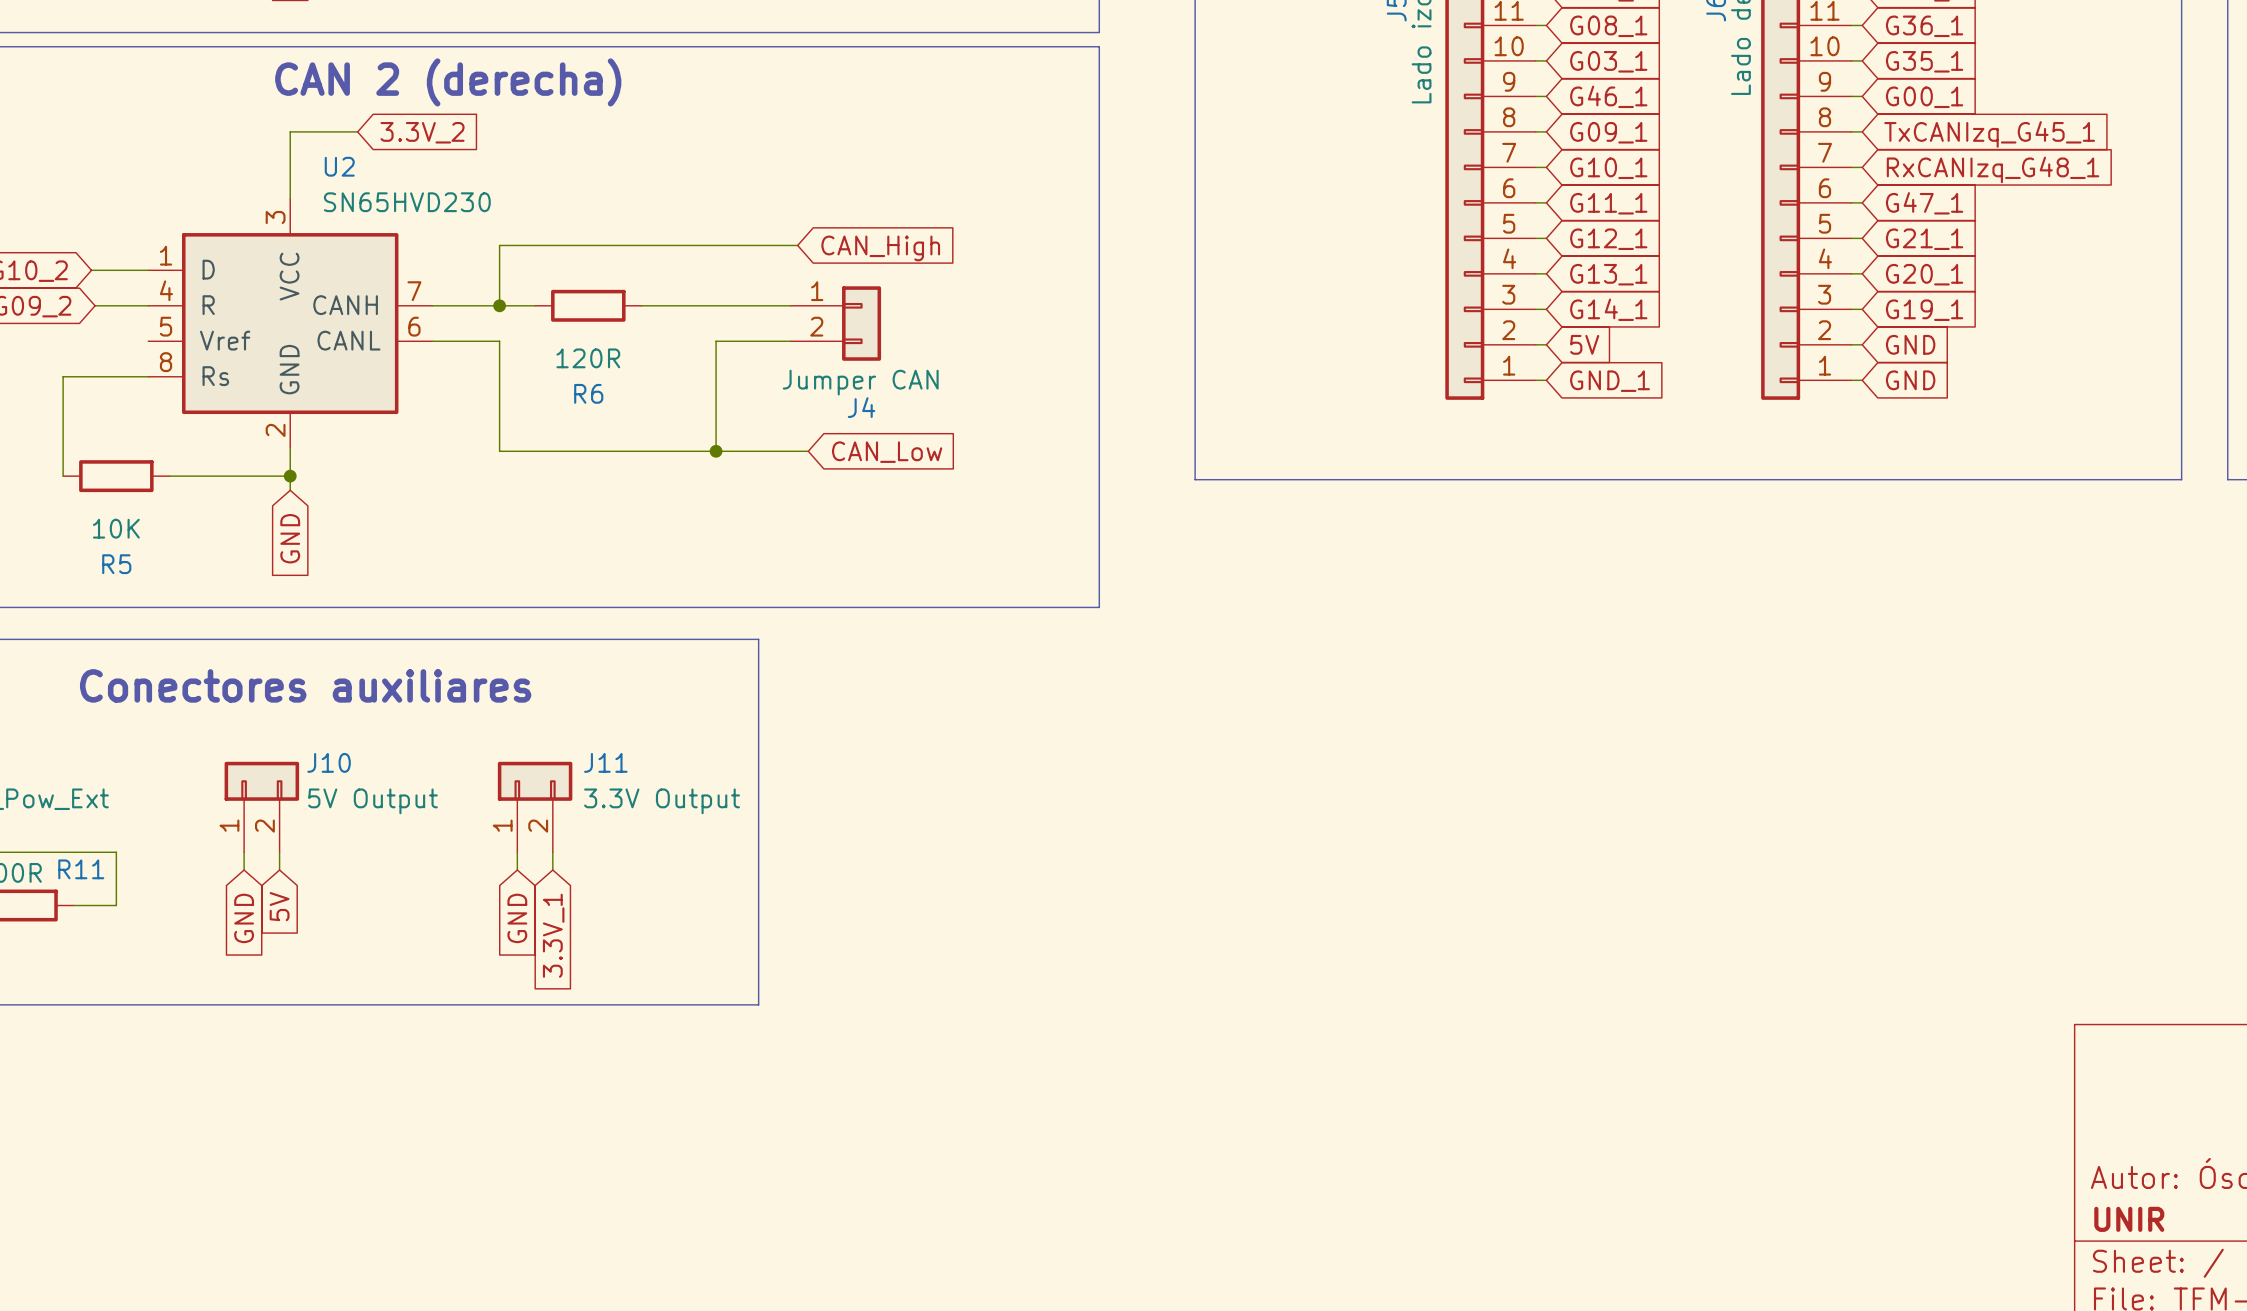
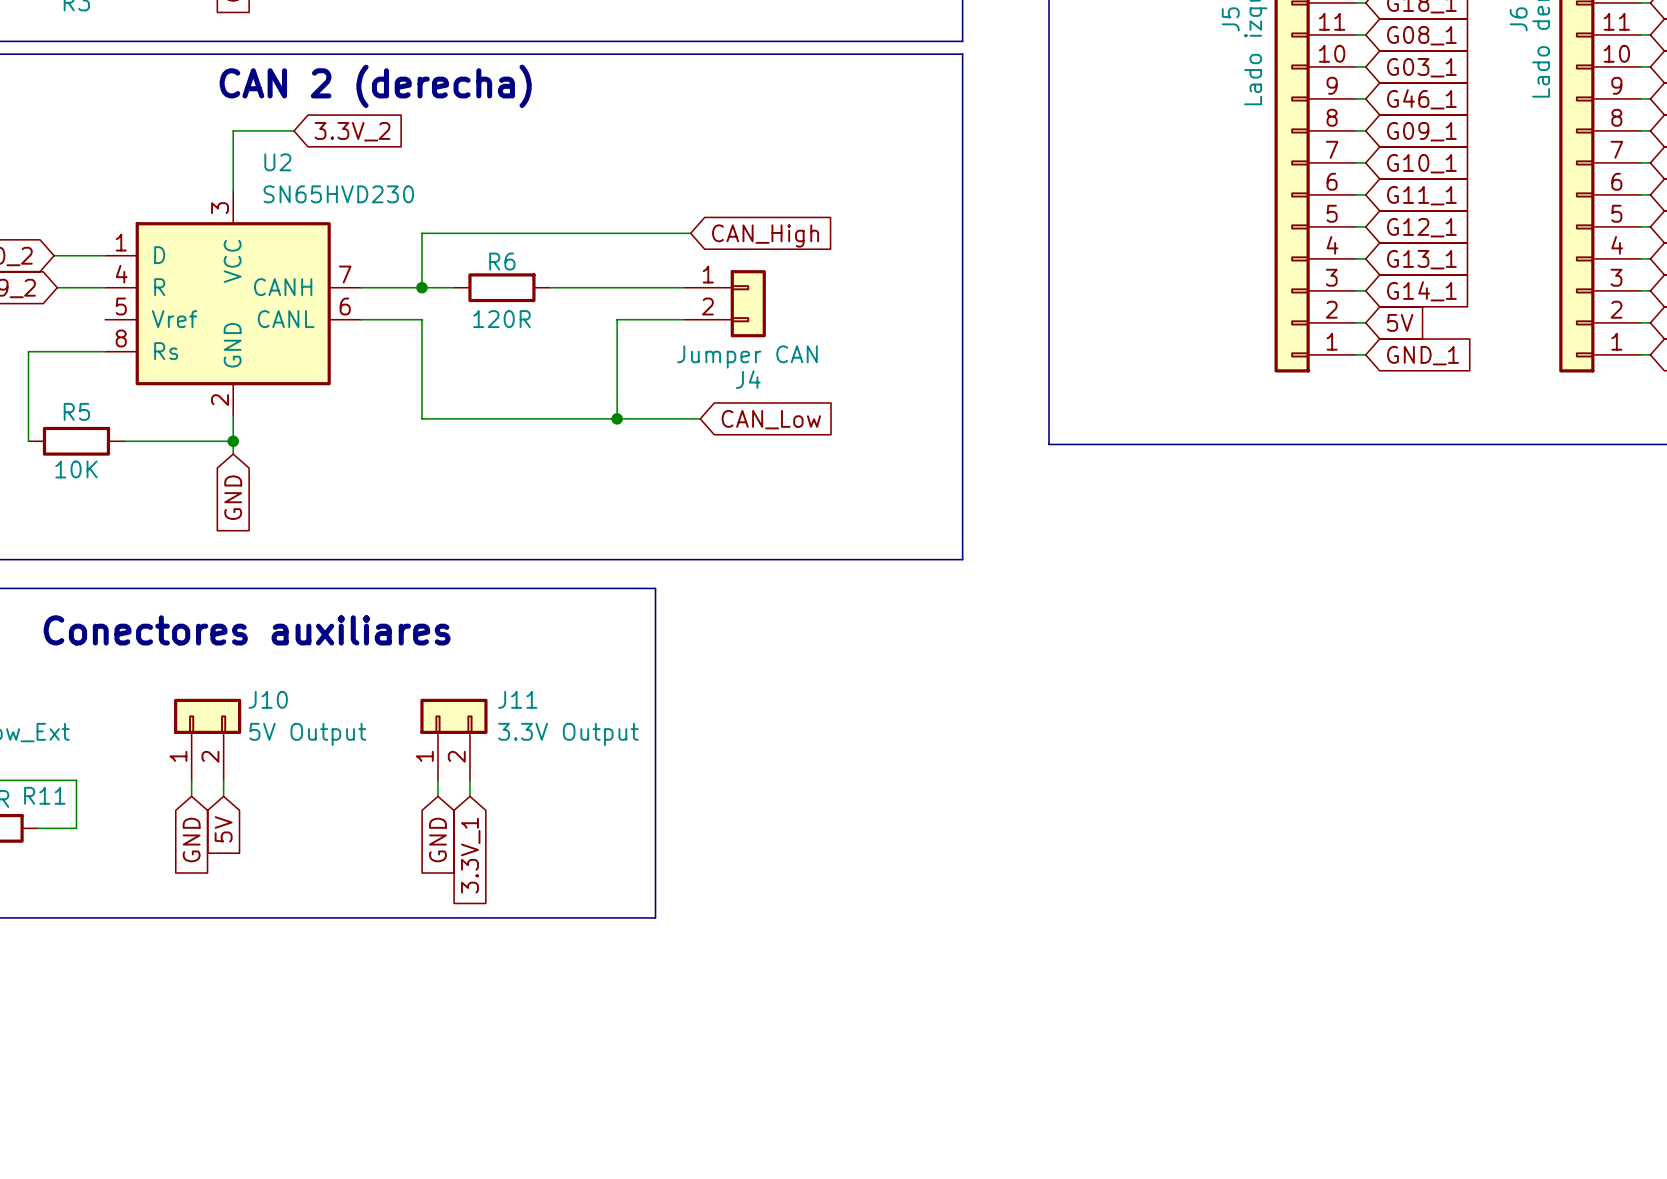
R6 value position: 120R (588, 358) -> 120R (501, 319)
R6 name position: R6 (588, 393) -> R6 (502, 261)
R5 value position: 10K (116, 528) -> 10K (76, 469)
R5 name position: R5 (116, 564) -> R5 (76, 411)

